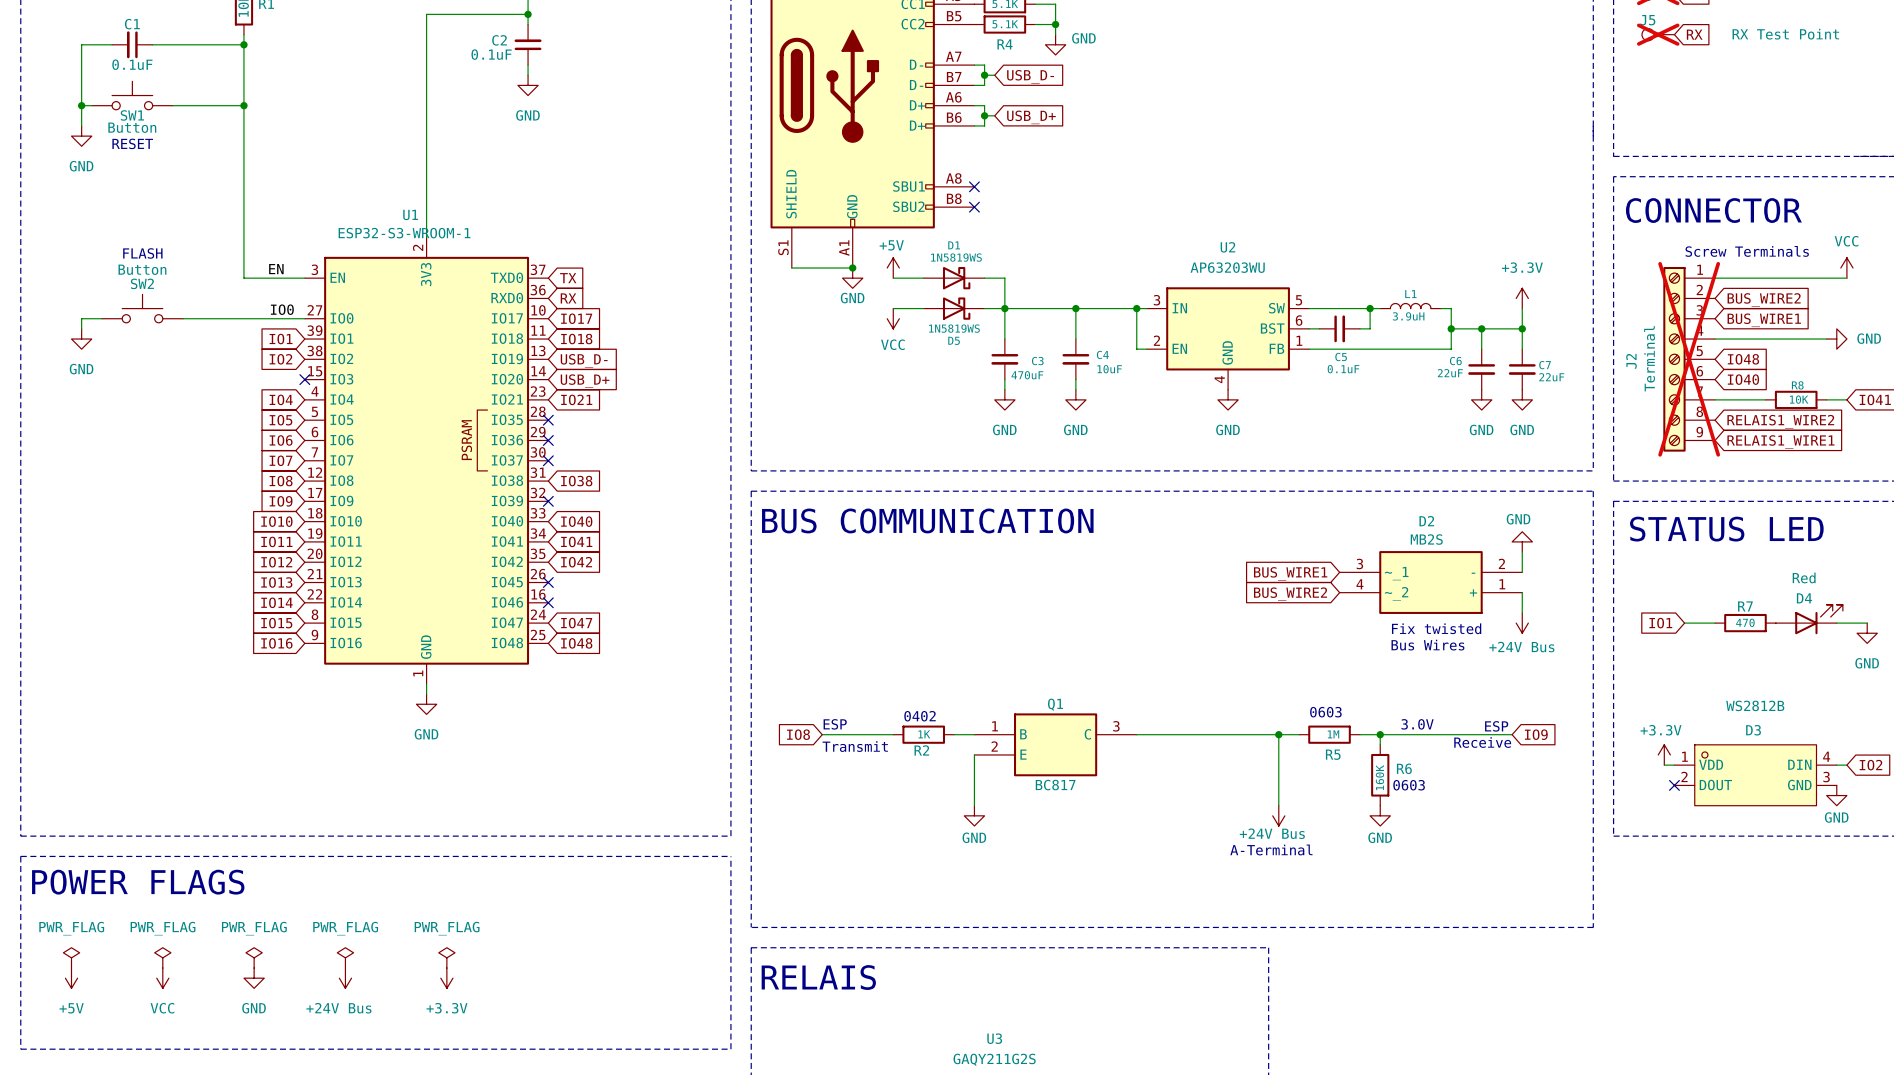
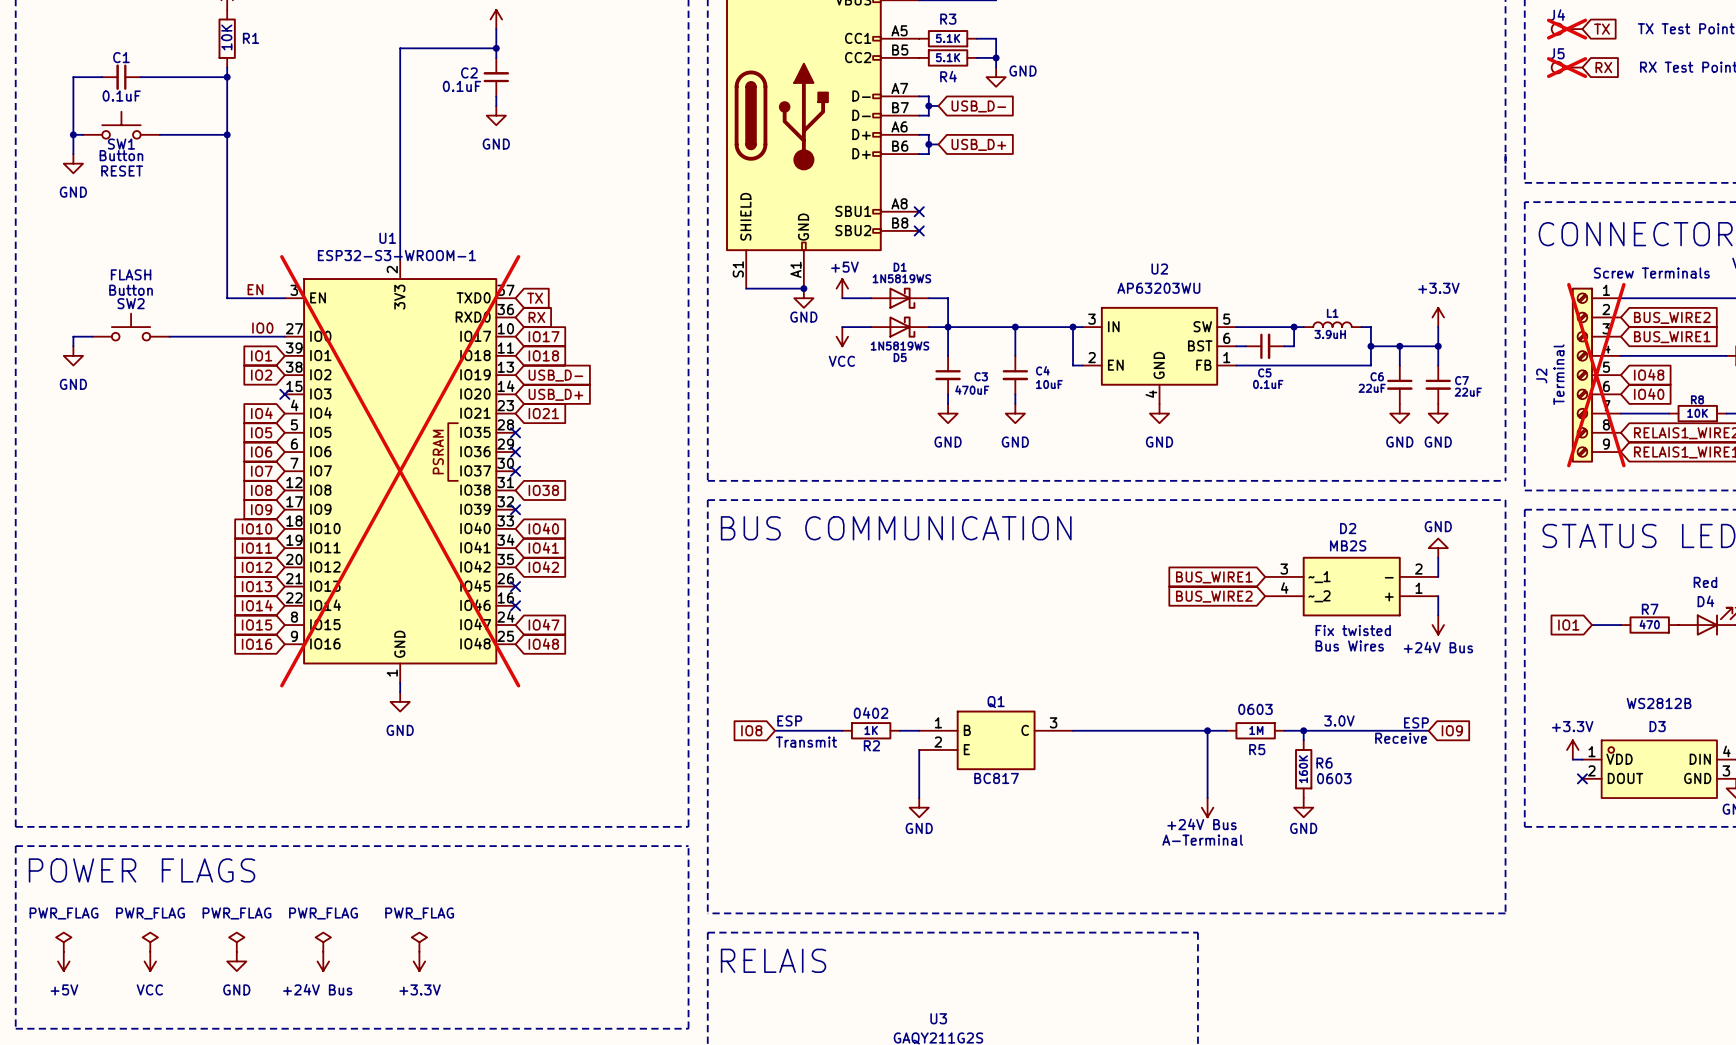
U1 do-not-place cross: none -> (400, 471)

